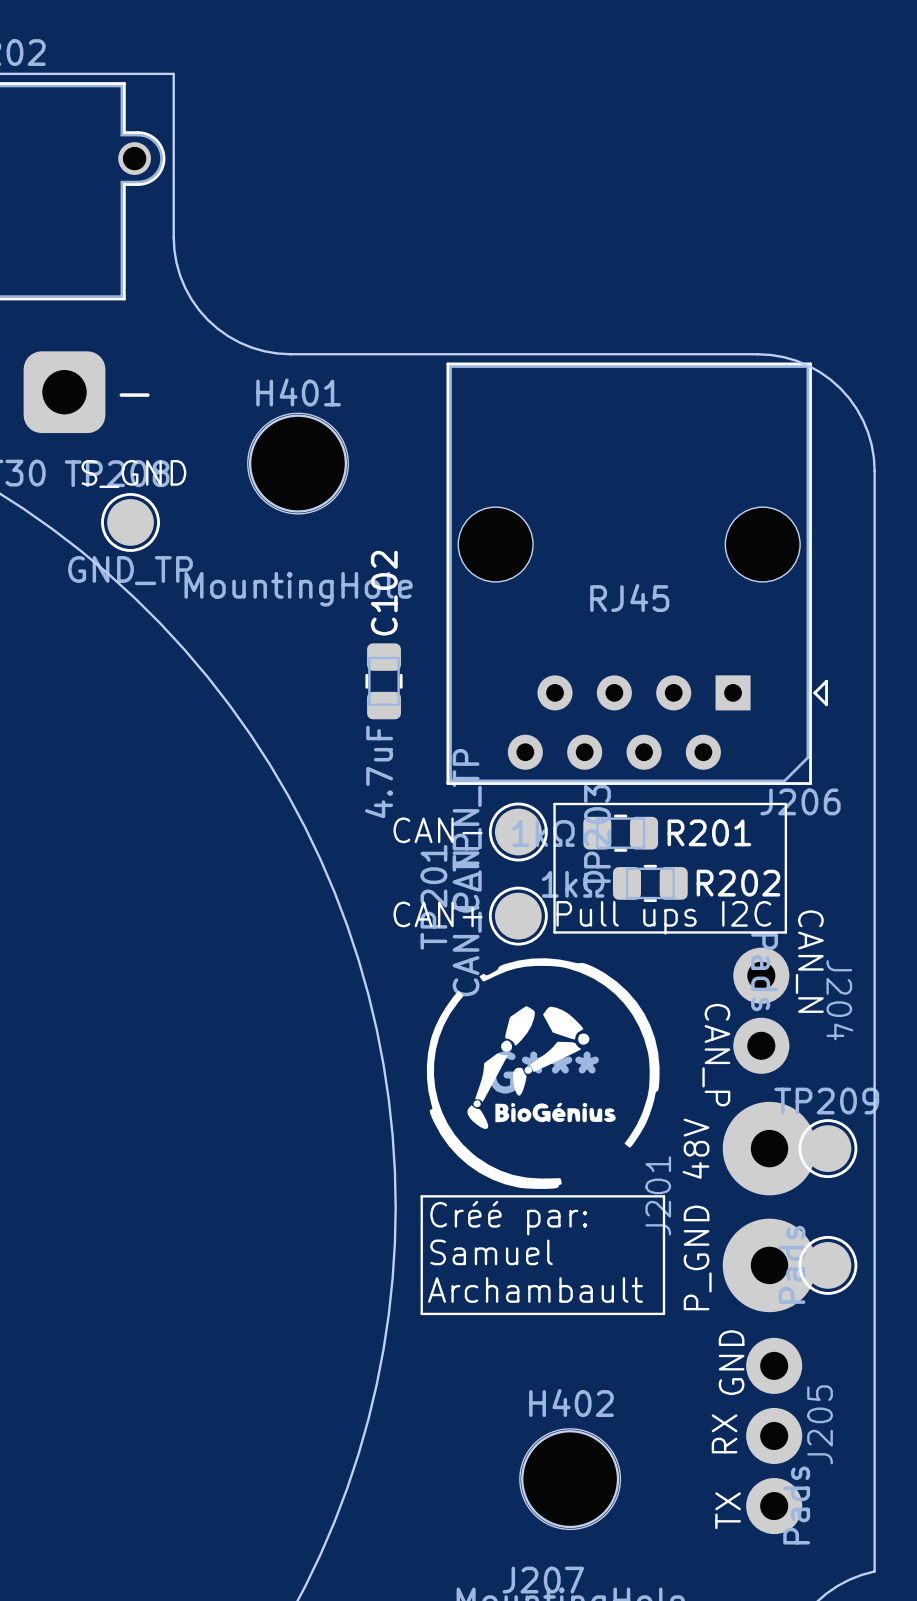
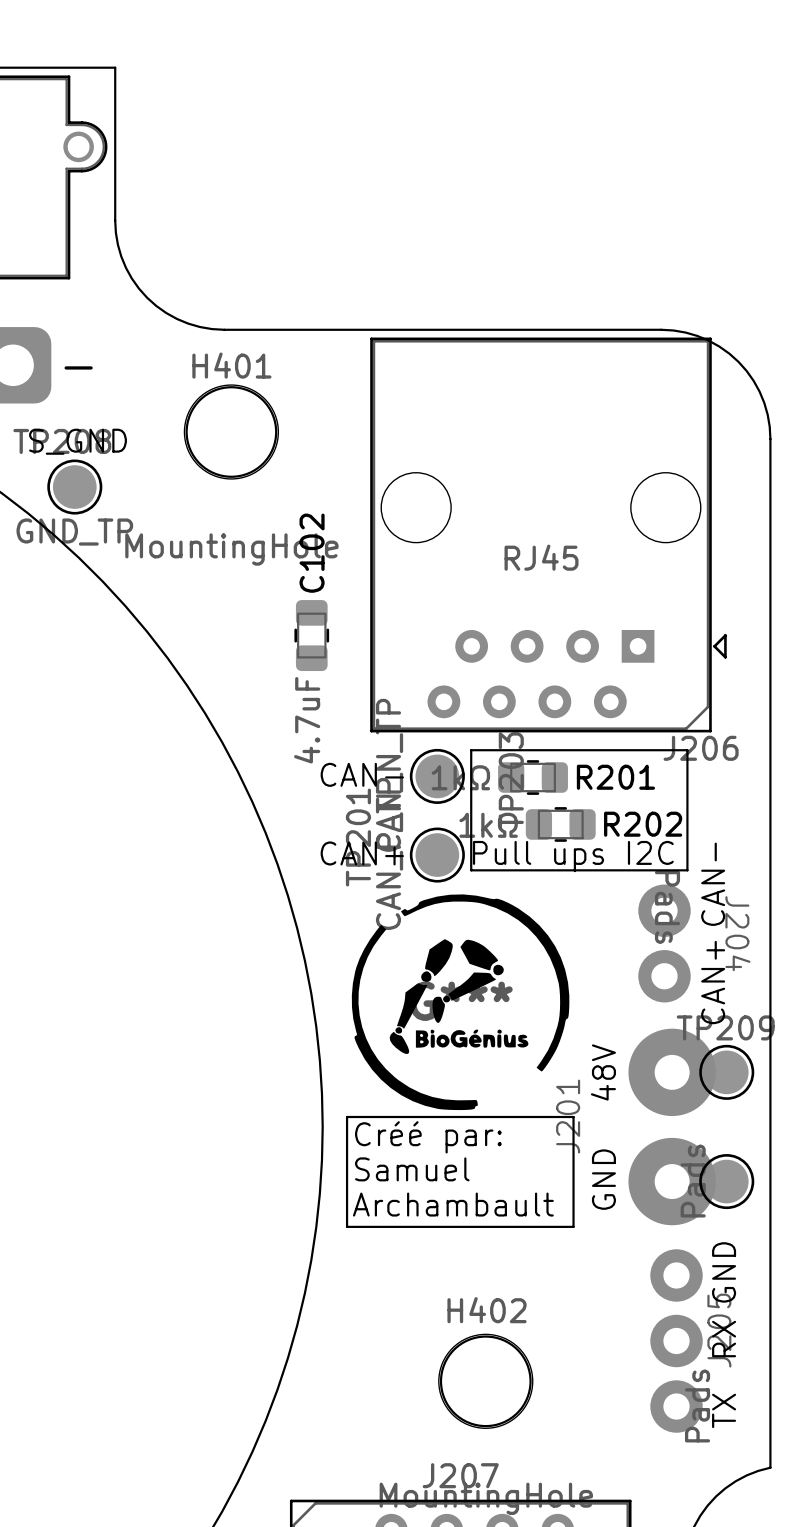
J204 text: none -> CAN- (713, 884)
J204 text: CAN_N (809, 961) -> none
J204 text: none -> CAN+ (713, 982)
J204 text: CAN_P (716, 1055) -> none
J201 text: P_GND (697, 1257) -> none
J201 text: none -> GND (603, 1179)
J205 text position: GND (731, 1362) -> GND (724, 1272)
J205 text position: RX (724, 1433) -> RX (724, 1339)
J205 text position: TX (728, 1510) -> TX (724, 1410)

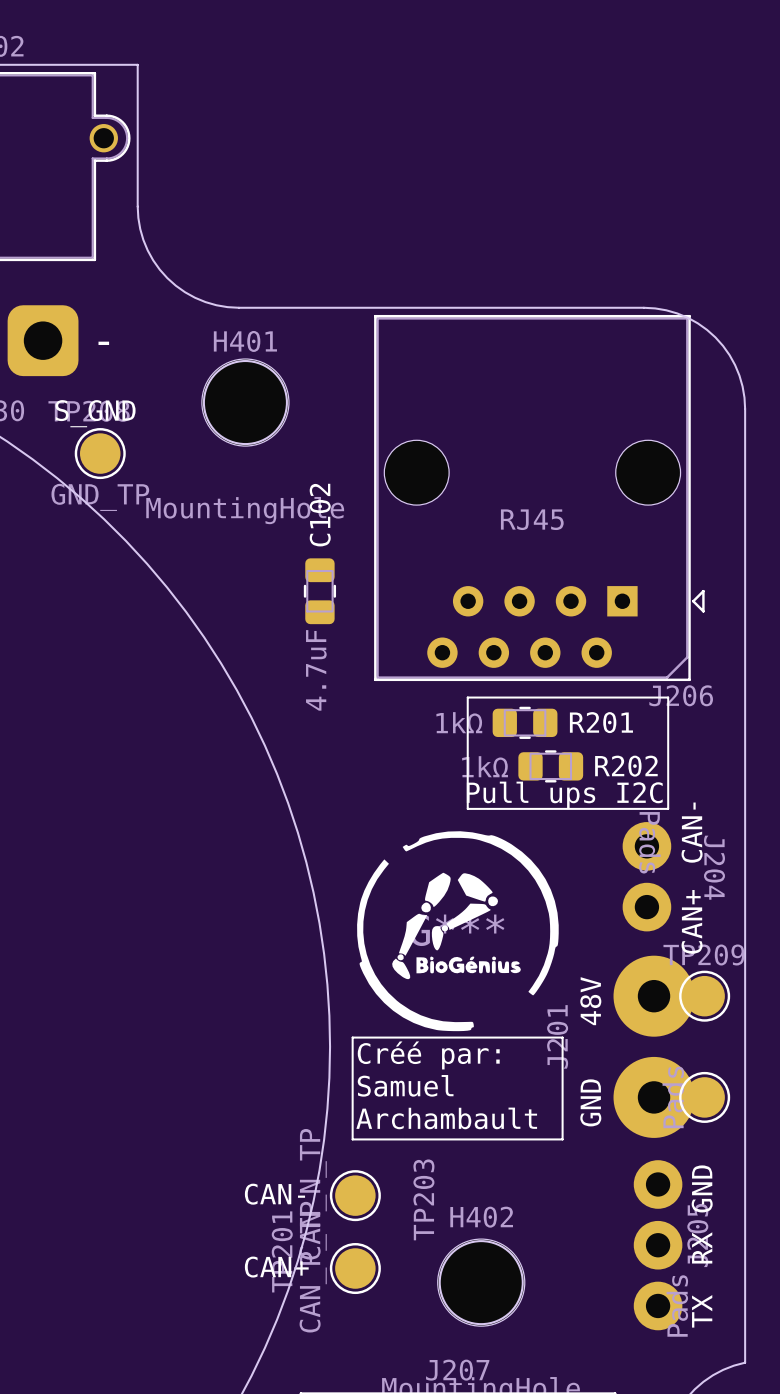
text position: CAN- (362, 774) -> CAN- (274, 1194)
TP203 position: (437, 776) -> (355, 1195)
text position: CAN+ (362, 853) -> CAN+ (276, 1267)
TP201 position: (437, 855) -> (355, 1268)

